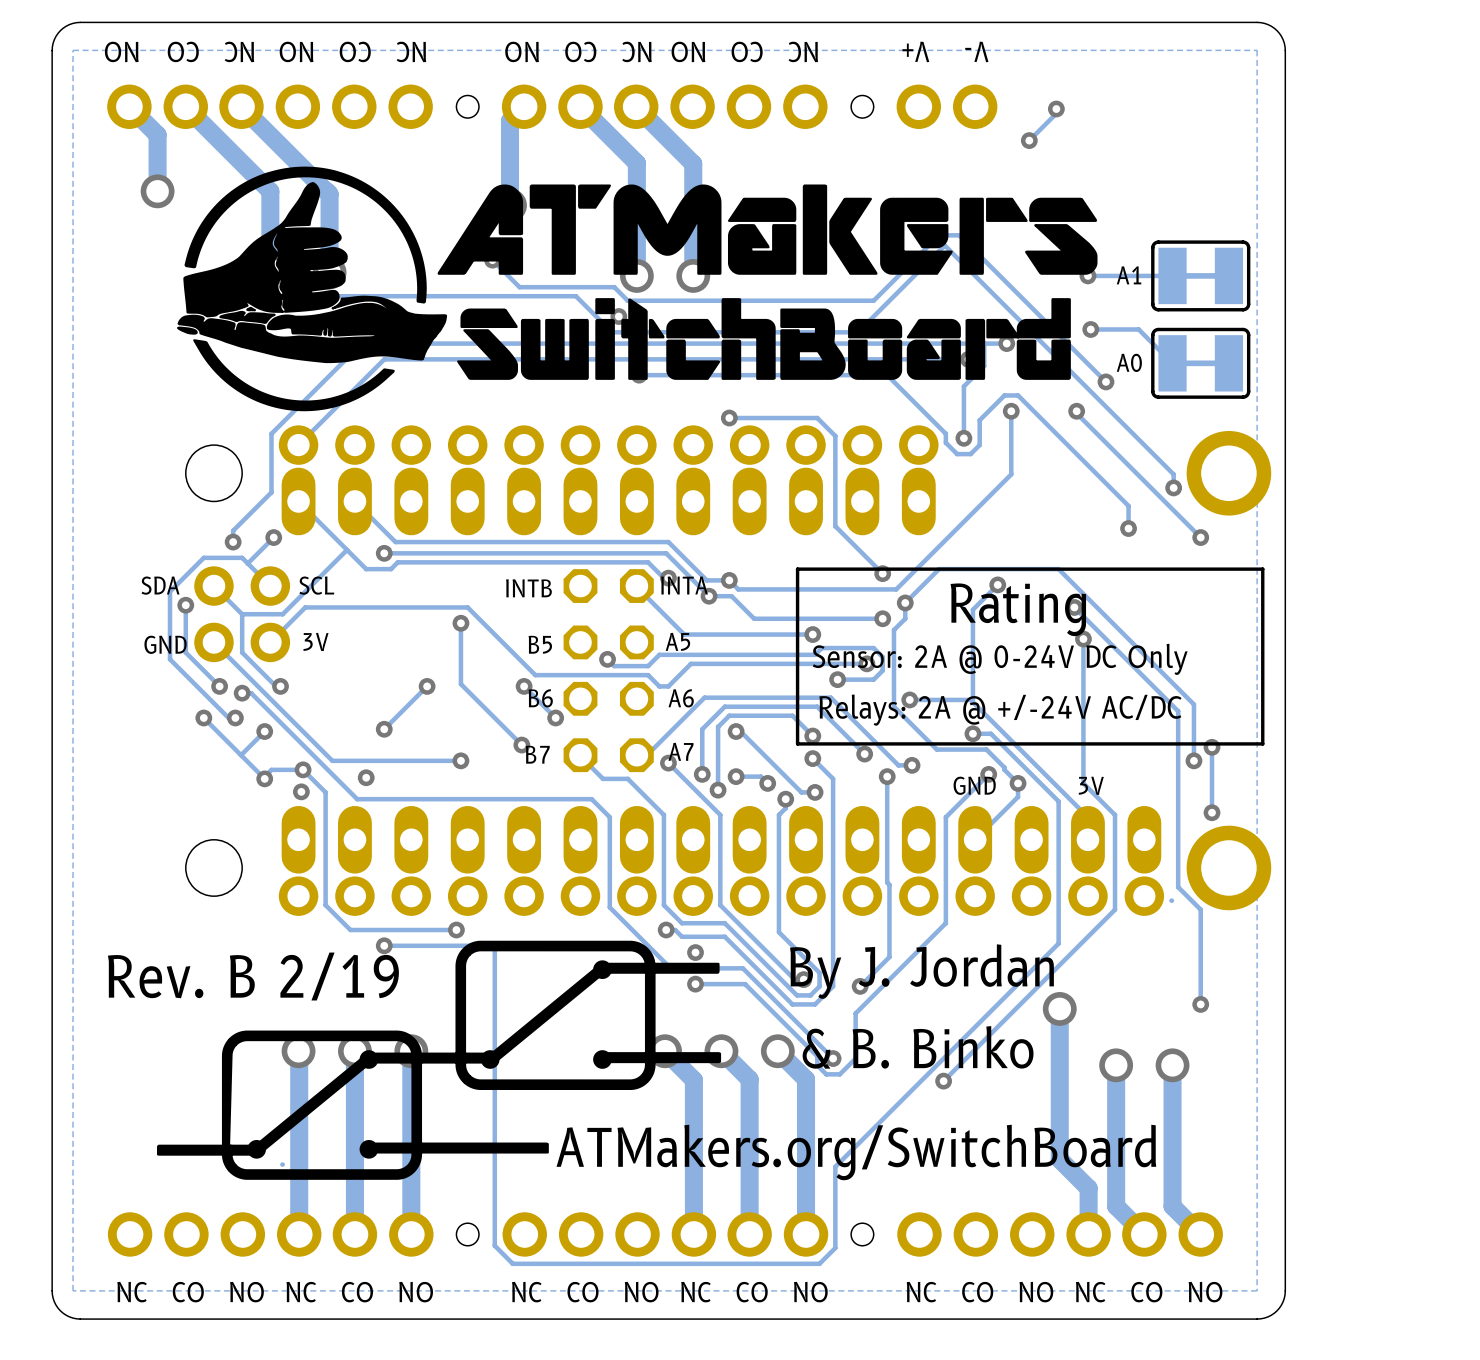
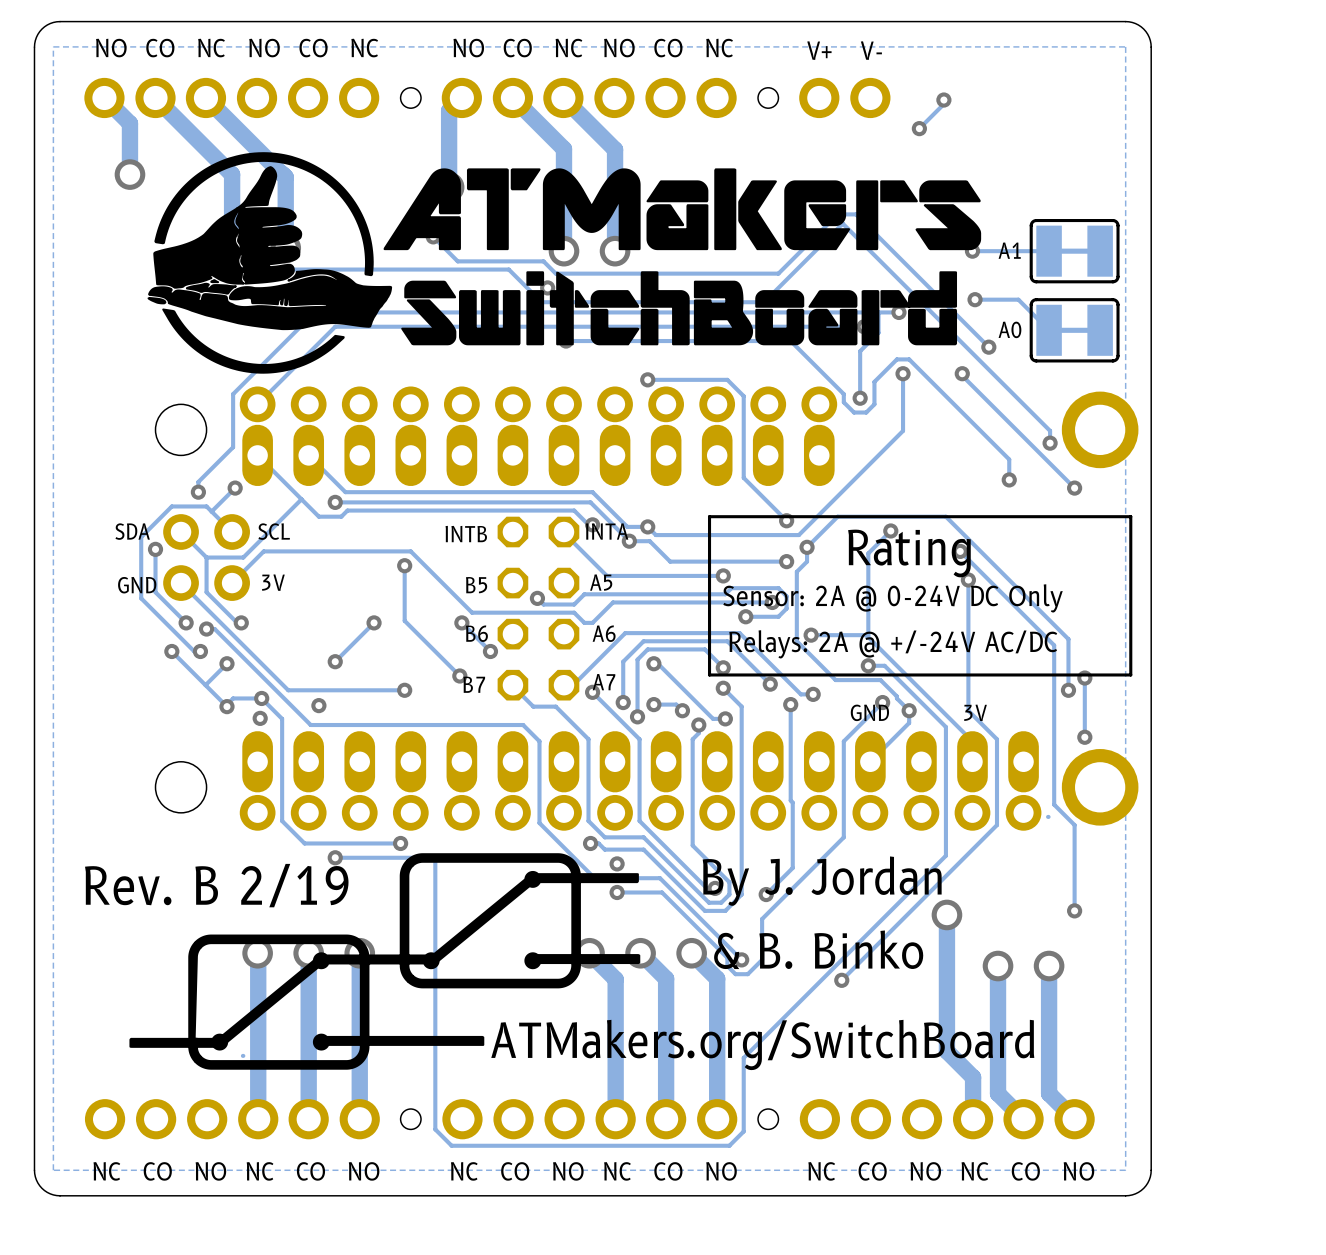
text rotation: 0° (121, 51) -> 180° (111, 48)
text rotation: 0° (183, 51) -> 180° (160, 48)
text rotation: 0° (239, 51) -> 180° (211, 48)
text rotation: 0° (296, 51) -> 180° (264, 48)
text rotation: 0° (355, 51) -> 180° (313, 48)
text rotation: 0° (411, 51) -> 180° (364, 48)
text rotation: 0° (522, 51) -> 180° (468, 48)
text rotation: 0° (580, 51) -> 180° (517, 48)
text rotation: 0° (637, 51) -> 180° (568, 48)
text rotation: 0° (688, 51) -> 180° (619, 48)
text rotation: 0° (747, 51) -> 180° (668, 48)
text rotation: 0° (803, 51) -> 180° (719, 48)
text rotation: 0° (915, 51) -> 180° (819, 50)
text rotation: 0° (976, 51) -> 180° (871, 50)

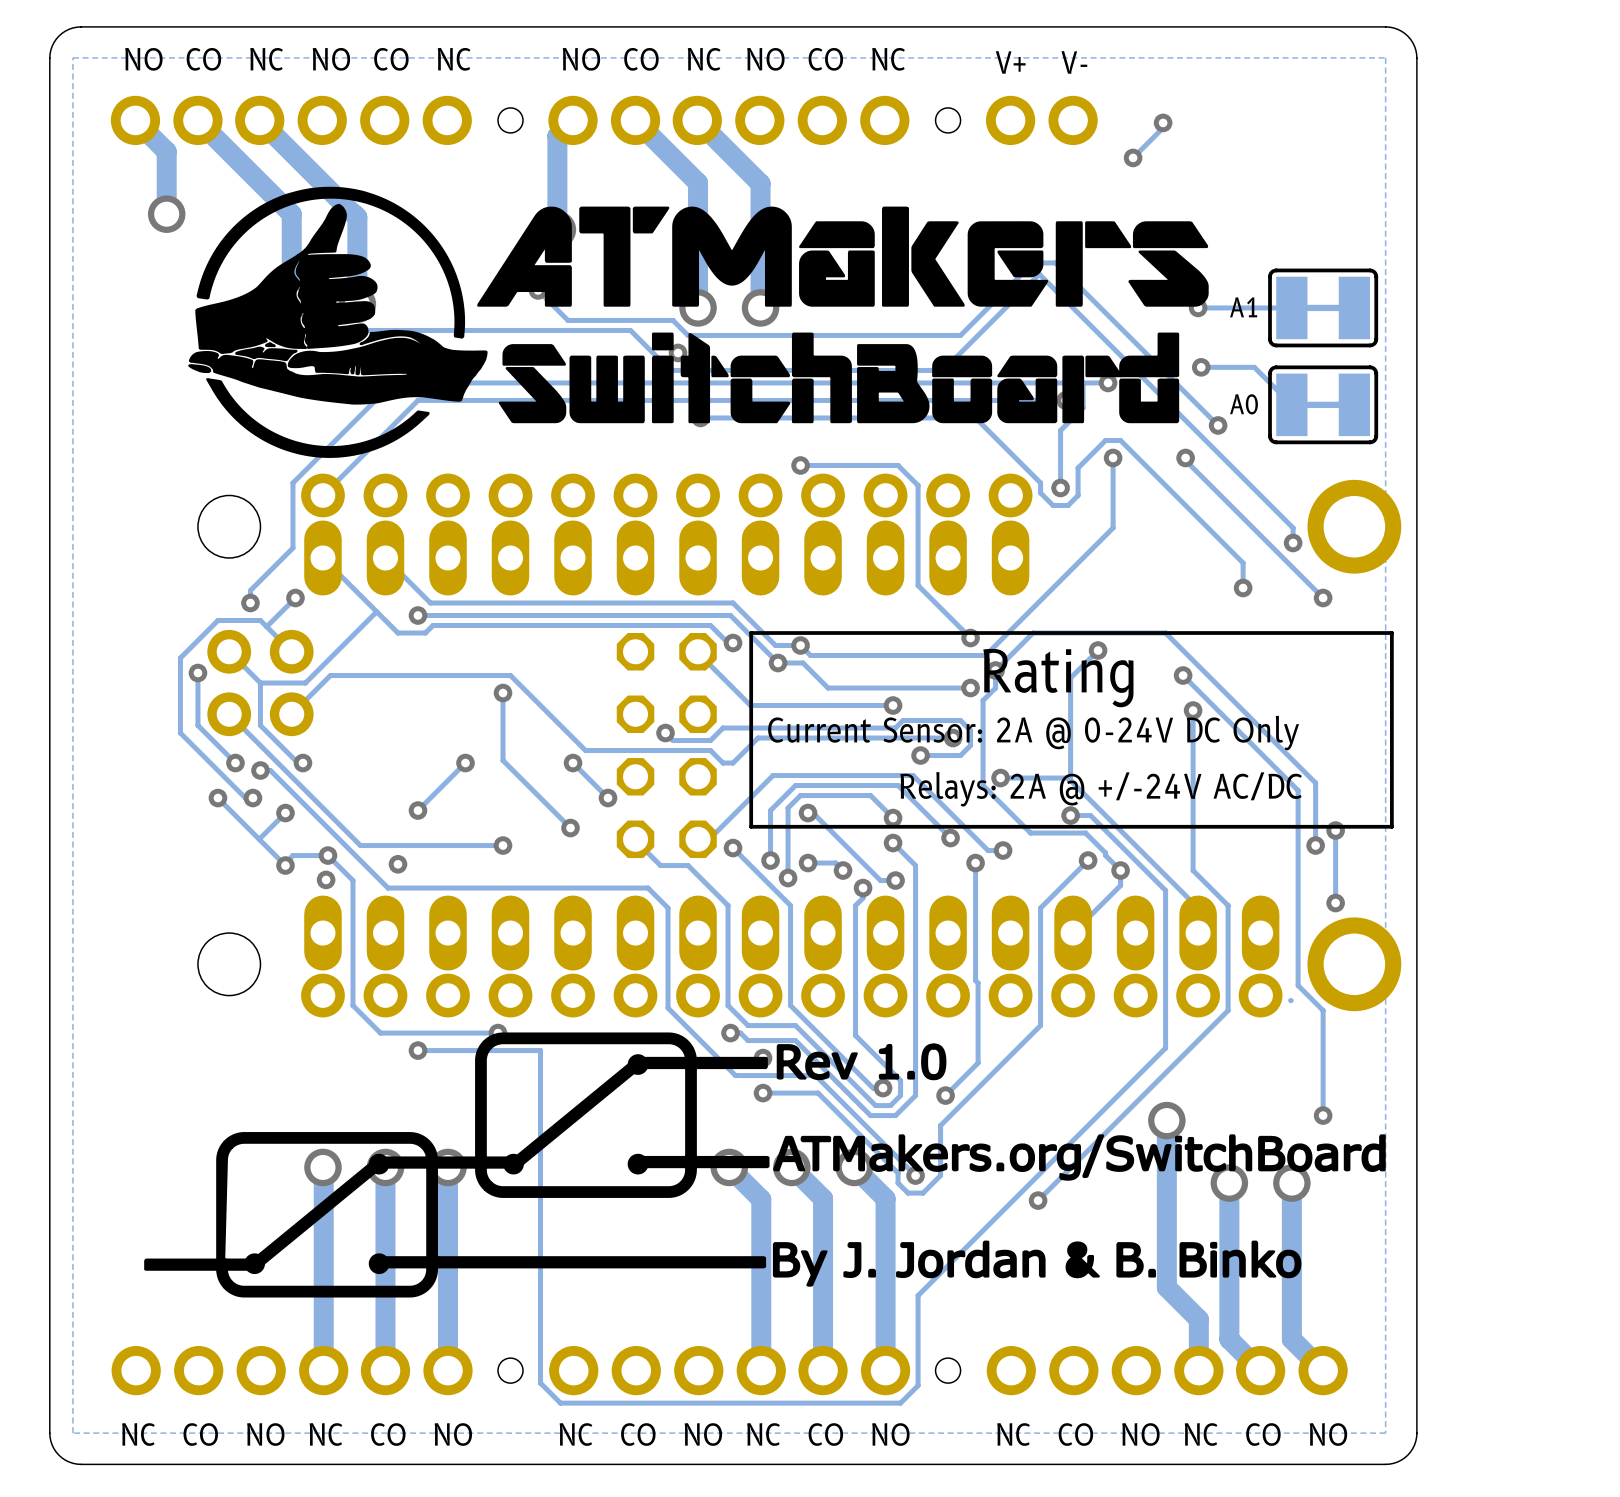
line: (709, 516) (709, 674) -> (876, 633) (751, 633) (751, 826) (876, 826)
text: SDA (132, 531) -> none
text: SCL (274, 531) -> none
text: INTA (607, 531) -> none
text: INTB (466, 534) -> none
text position: Rating (909, 553) -> Rating (1058, 678)
text: 3V (273, 582) -> none
text: A5 (601, 582) -> none
text: GND (137, 585) -> none
text: B5 (476, 585) -> none
text: Sensor: 2A @ 0-24V DC Only (893, 598) -> Current Sensor: 2A @ 0-24V DC Only (1033, 733)
text: B6 (476, 633) -> none
text: A6 (604, 633) -> none
text: A7 (603, 682) -> none
text: B7 (474, 684) -> none
text: GND (869, 712) -> none
text: 3V (975, 712) -> none
drawing: none -> [144, 1032, 1386, 1298]
drawing: [129, 853, 641, 1070] -> none
text: By J. Jordan (822, 881) -> none
text: Rev. B 2/19 (216, 885) -> none
text: & B. Binko (818, 949) -> none
text: ATMakers.org/SwitchBoard (762, 1044) -> none

